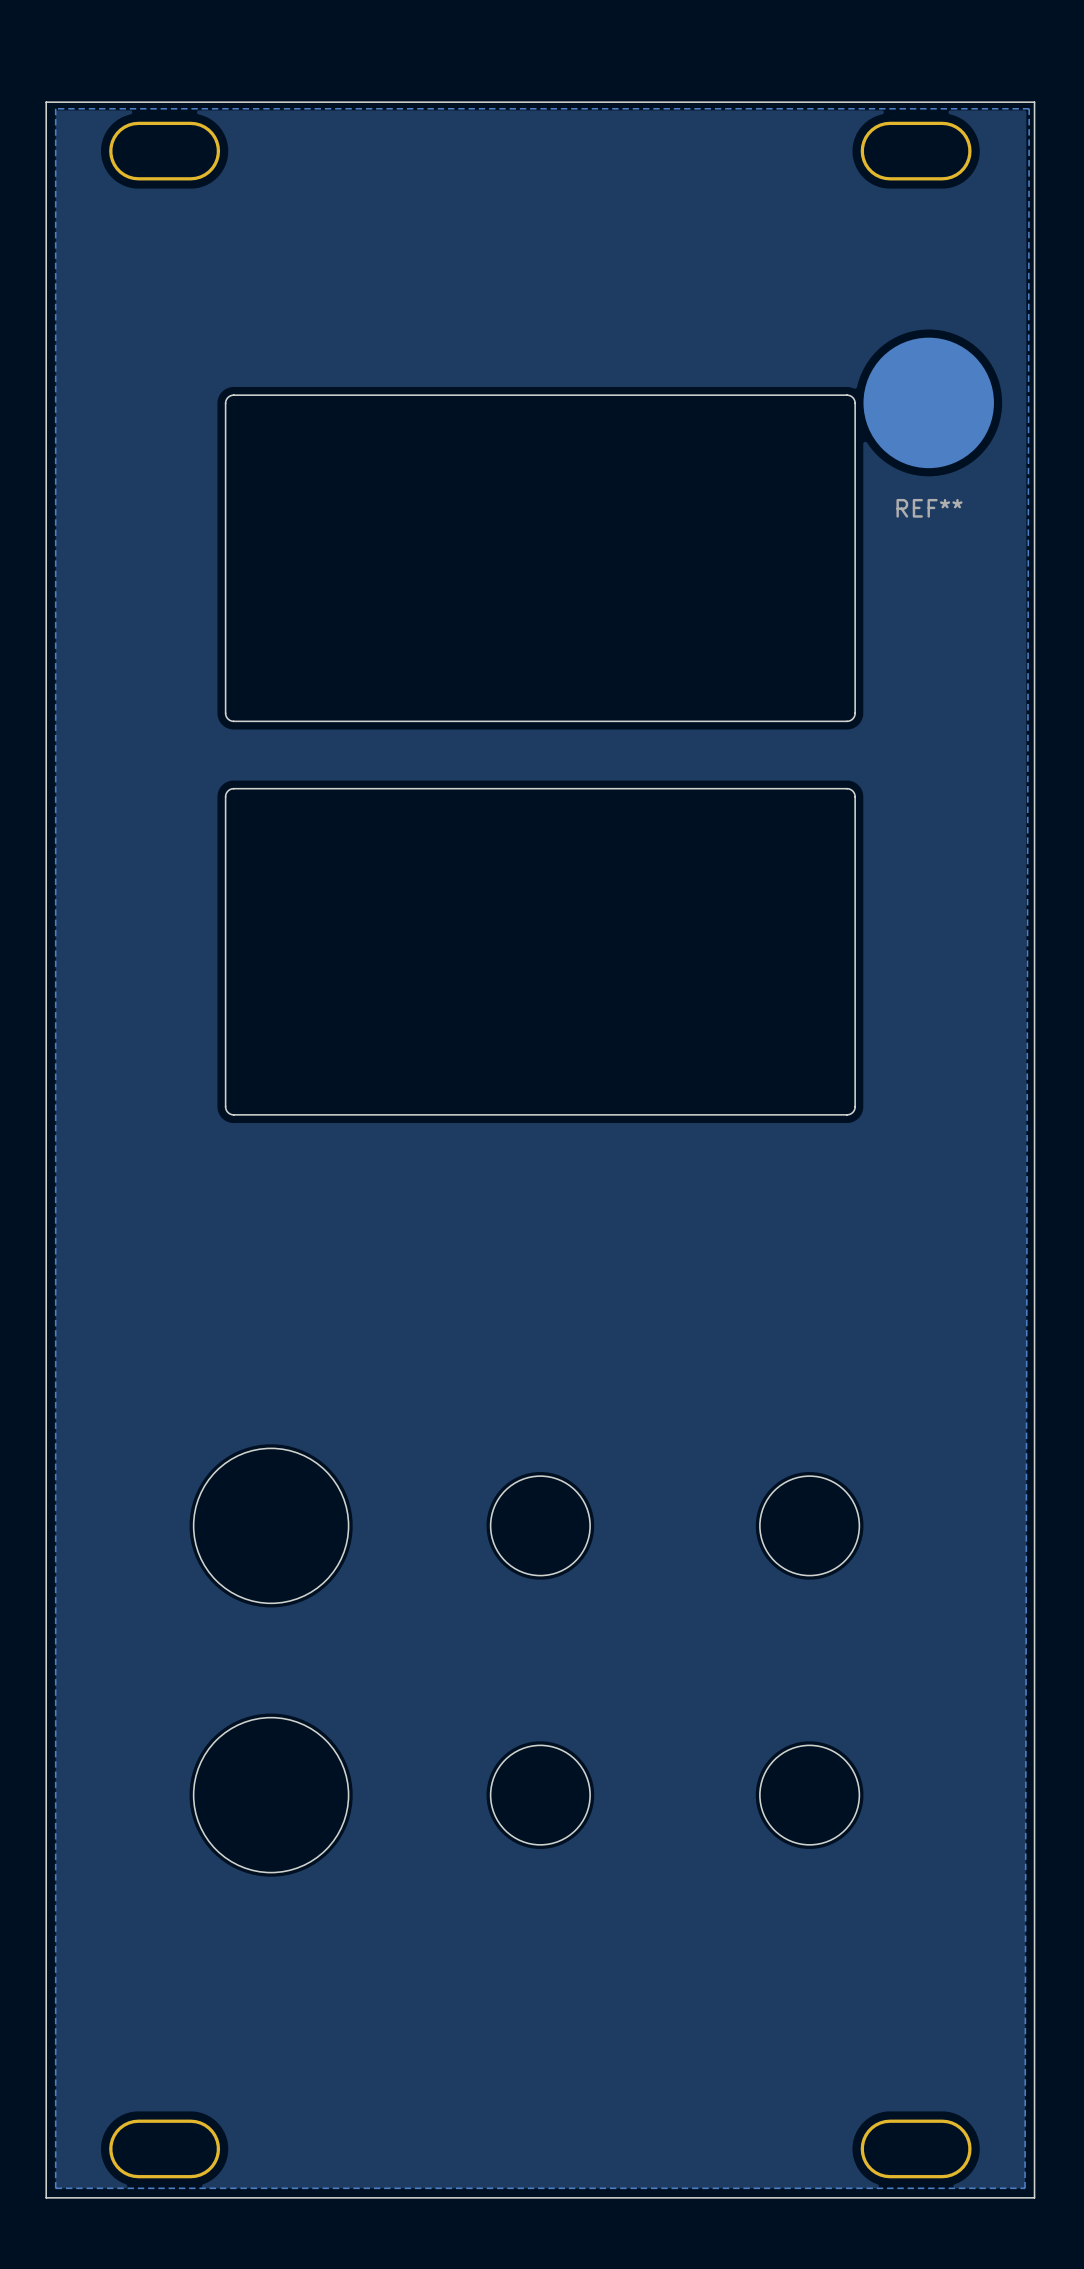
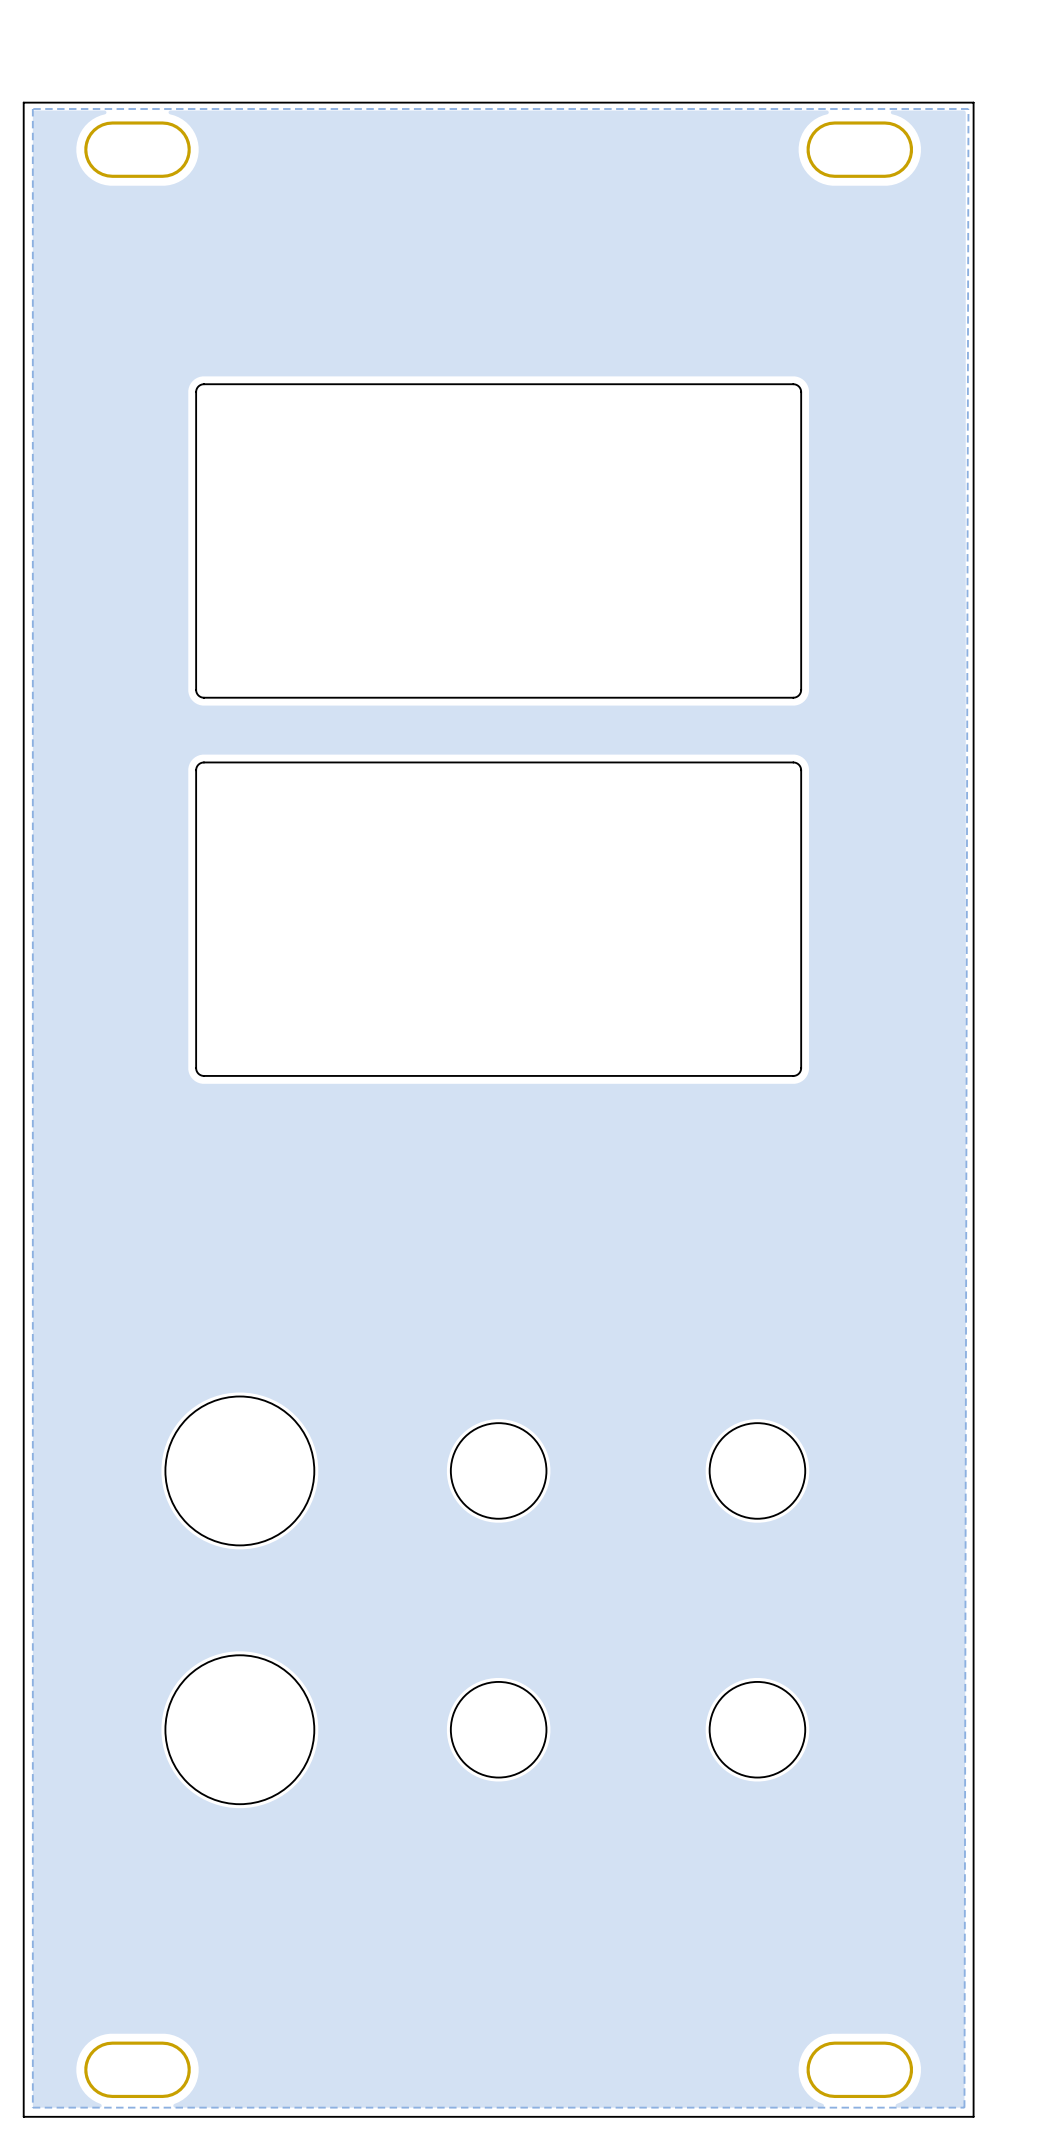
REF**: (928, 402) -> none

